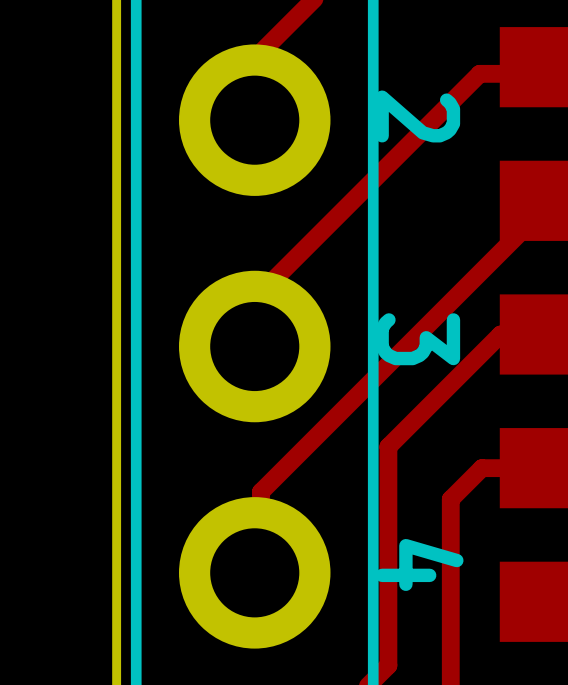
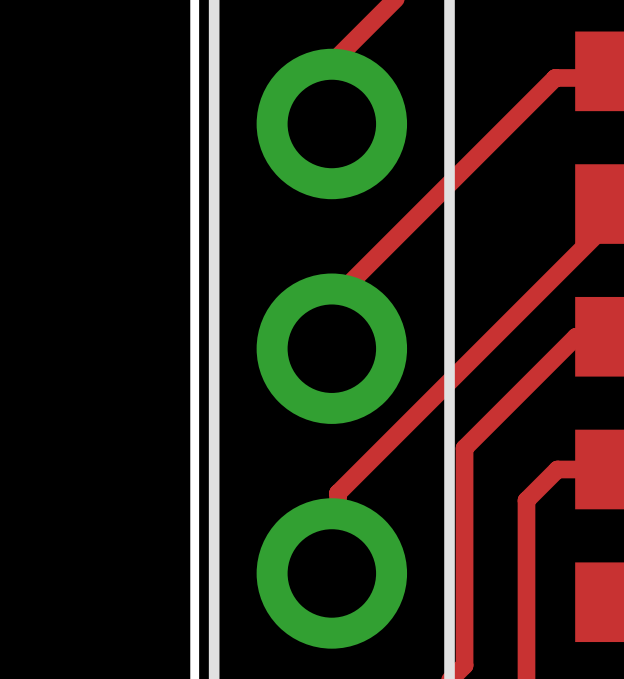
text: 2 (417, 116) -> none
text: 3 (417, 339) -> none
text: 4 (419, 564) -> none

